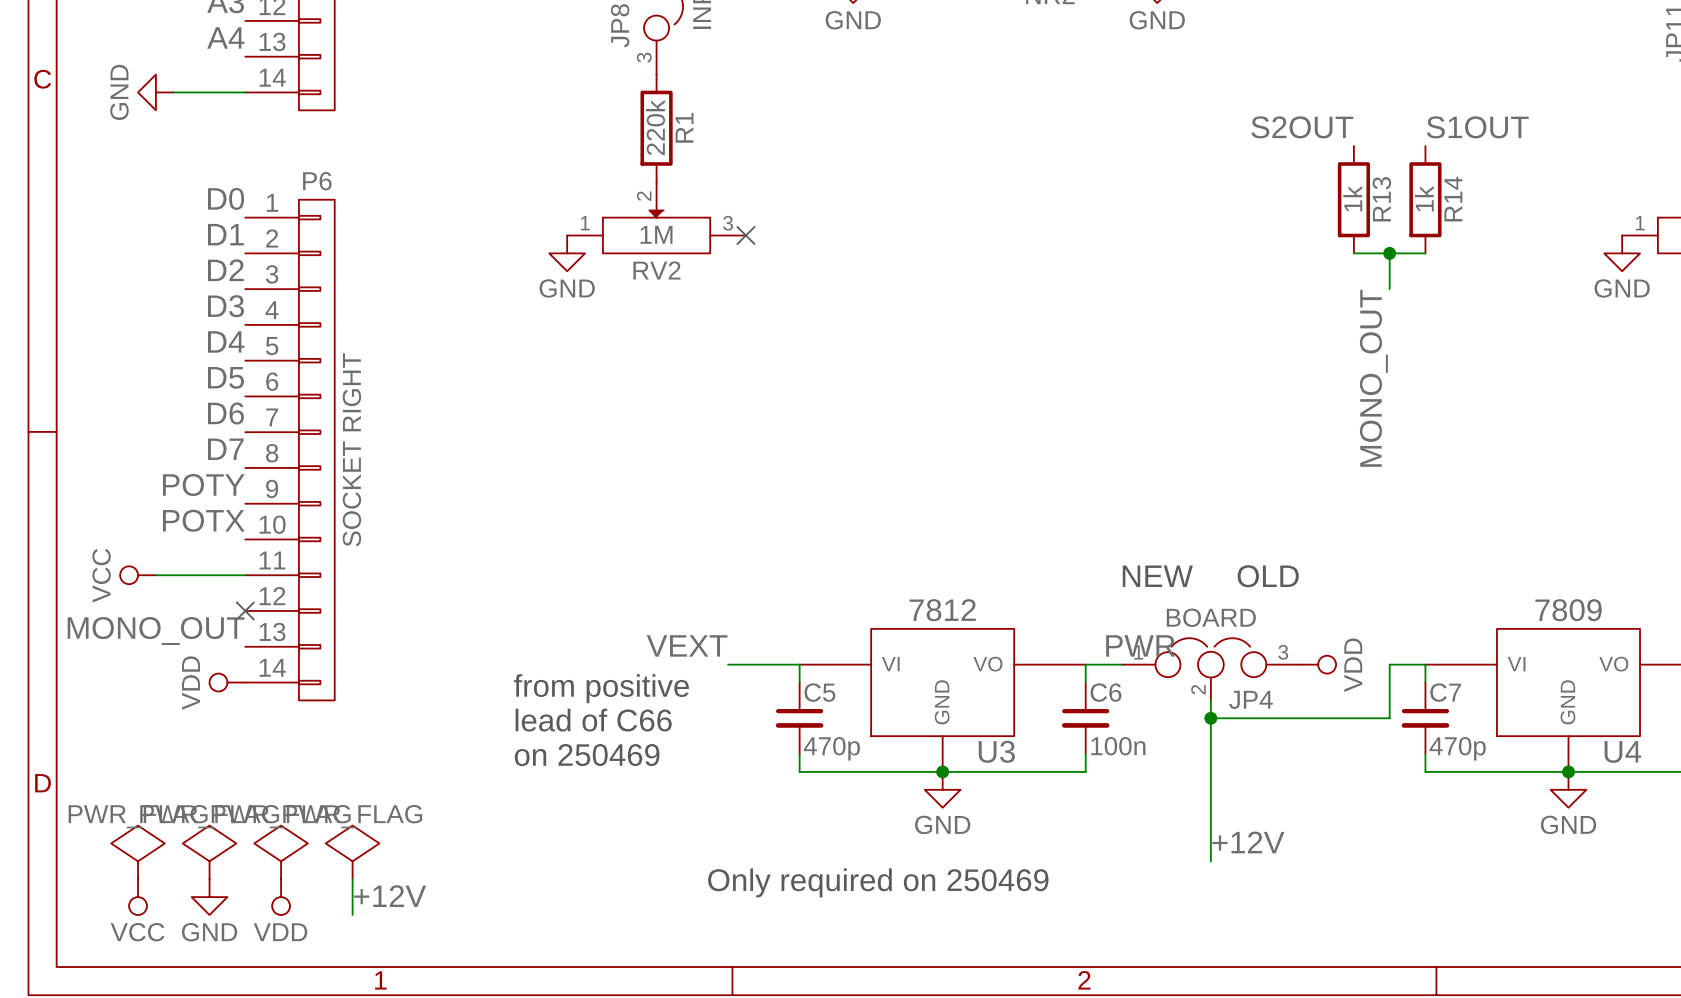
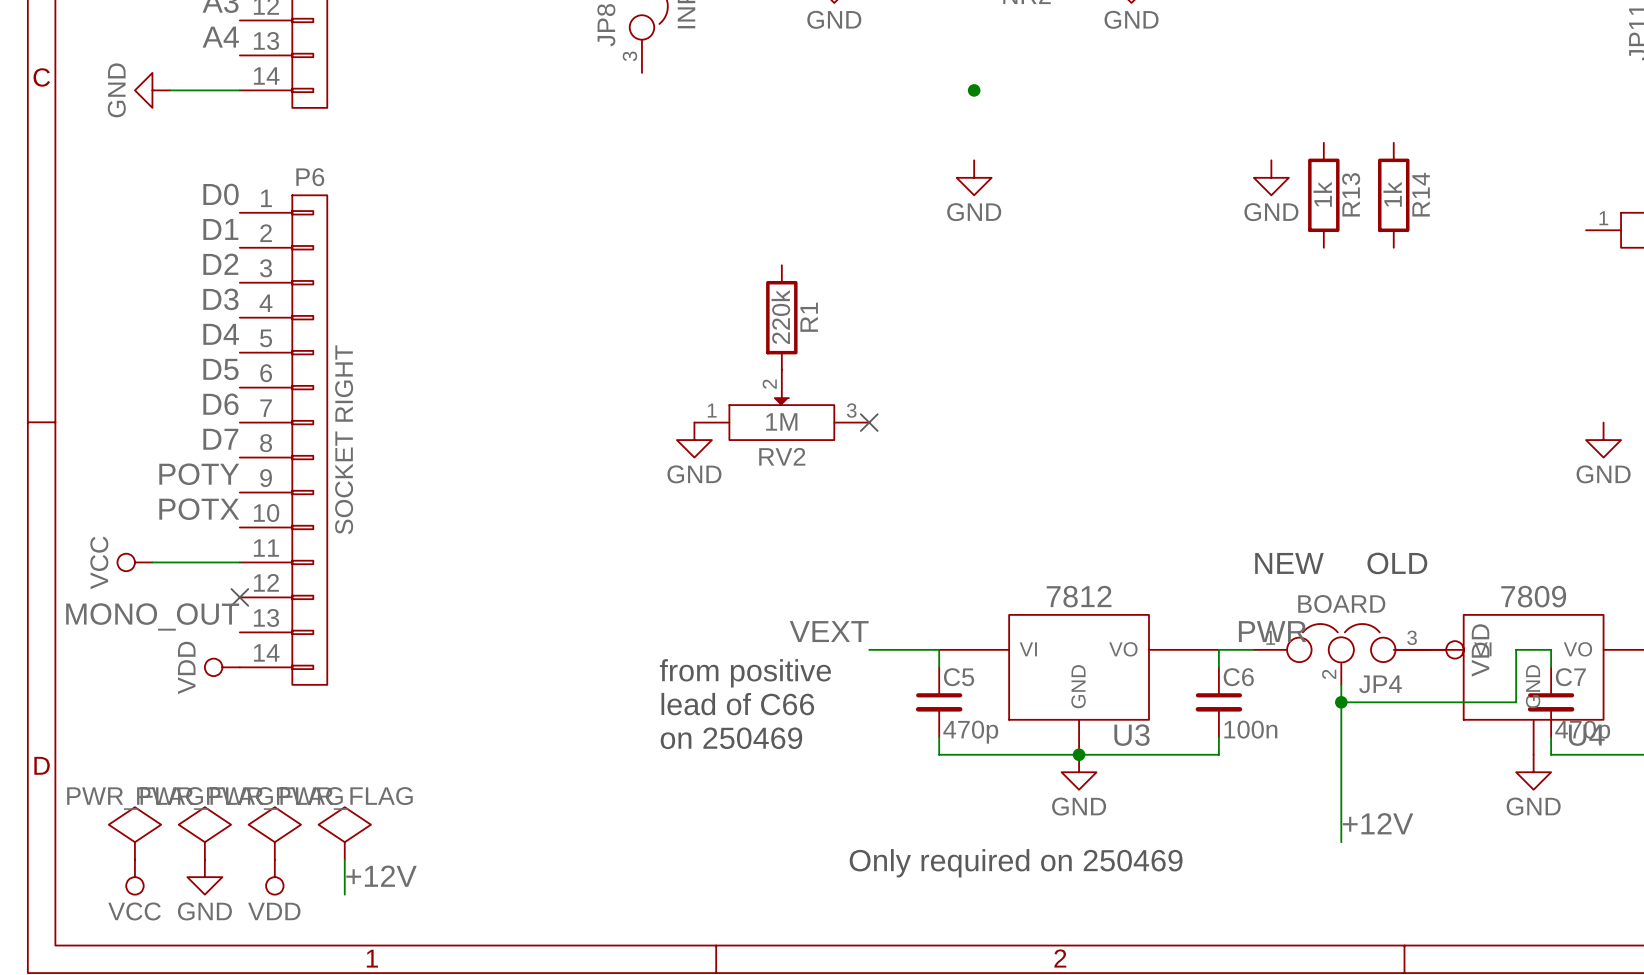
junction: none -> (974, 90)
label: S2OUT (1302, 127) -> none
label: S1OUT (1477, 127) -> none
R1 position: (656, 128) -> (781, 317)
power symbol: none -> GND (974, 177)
power symbol: none -> GND (1271, 177)
RV2 position: (656, 217) -> (781, 405)
no-connect mark: (745, 235) -> none
power symbol: GND (567, 253) -> none
wire: (1353, 253) (1425, 253) -> none
wire: (1389, 253) (1389, 289) -> none
junction: (1389, 253) -> none
power symbol: GND (1622, 253) -> none
label: MONO_OUT (1373, 378) -> none
no-connect mark: none -> (869, 422)
power symbol: none -> GND (694, 440)
power symbol: none -> GND (1603, 440)
text position: NEW (1157, 576) -> NEW (1289, 563)
text position: OLD (1268, 576) -> OLD (1397, 563)
label position: VEXT (687, 645) -> VEXT (829, 631)
label position: PWR (1140, 645) -> PWR (1272, 631)
wire: (728, 664) (799, 664) (799, 682) -> (869, 649) (939, 649) (939, 667)
wire: (1121, 664) (1085, 664) (1085, 682) -> (1253, 649) (1218, 649) (1218, 667)
power symbol position: VDD (1318, 664) -> VDD (1446, 649)
JP4 position: (1210, 669) -> (1341, 654)
wire: (1425, 682) (1425, 664) (1389, 664) (1389, 718) -> (1551, 667) (1551, 649) (1516, 649) (1516, 702) (1358, 702)
text position: from positive (601, 688) -> from positive (745, 673)
U3 position: (942, 700) -> (1079, 684)
wire: (1210, 700) (1210, 861) -> (1341, 684) (1341, 842)
C5 position: (799, 718) -> (939, 702)
C6 position: (1085, 718) -> (1218, 702)
wire: (1210, 718) (1371, 718) -> none
junction: (1210, 718) -> none
junction: none -> (1341, 702)
C7 position: (1425, 718) -> (1551, 702)
text position: lead of C66 (593, 720) -> lead of C66 (737, 704)
wire: (799, 754) (799, 771) (960, 771) -> (939, 737) (939, 754)
wire: (1085, 754) (1085, 771) -> (1218, 737) (1218, 754) (1061, 754)
wire: (1425, 754) (1425, 771) (1586, 771) -> (1551, 737) (1551, 754)
text position: on 250469 (587, 755) -> on 250469 (731, 738)
junction: (942, 771) -> none
junction: none -> (1079, 754)
junction: (1568, 771) -> none
power symbol position: GND (942, 789) -> GND (1079, 772)
label position: +12V (1248, 842) -> +12V (1378, 823)
text position: Only required on 250469 (878, 882) -> Only required on 250469 (1016, 863)

